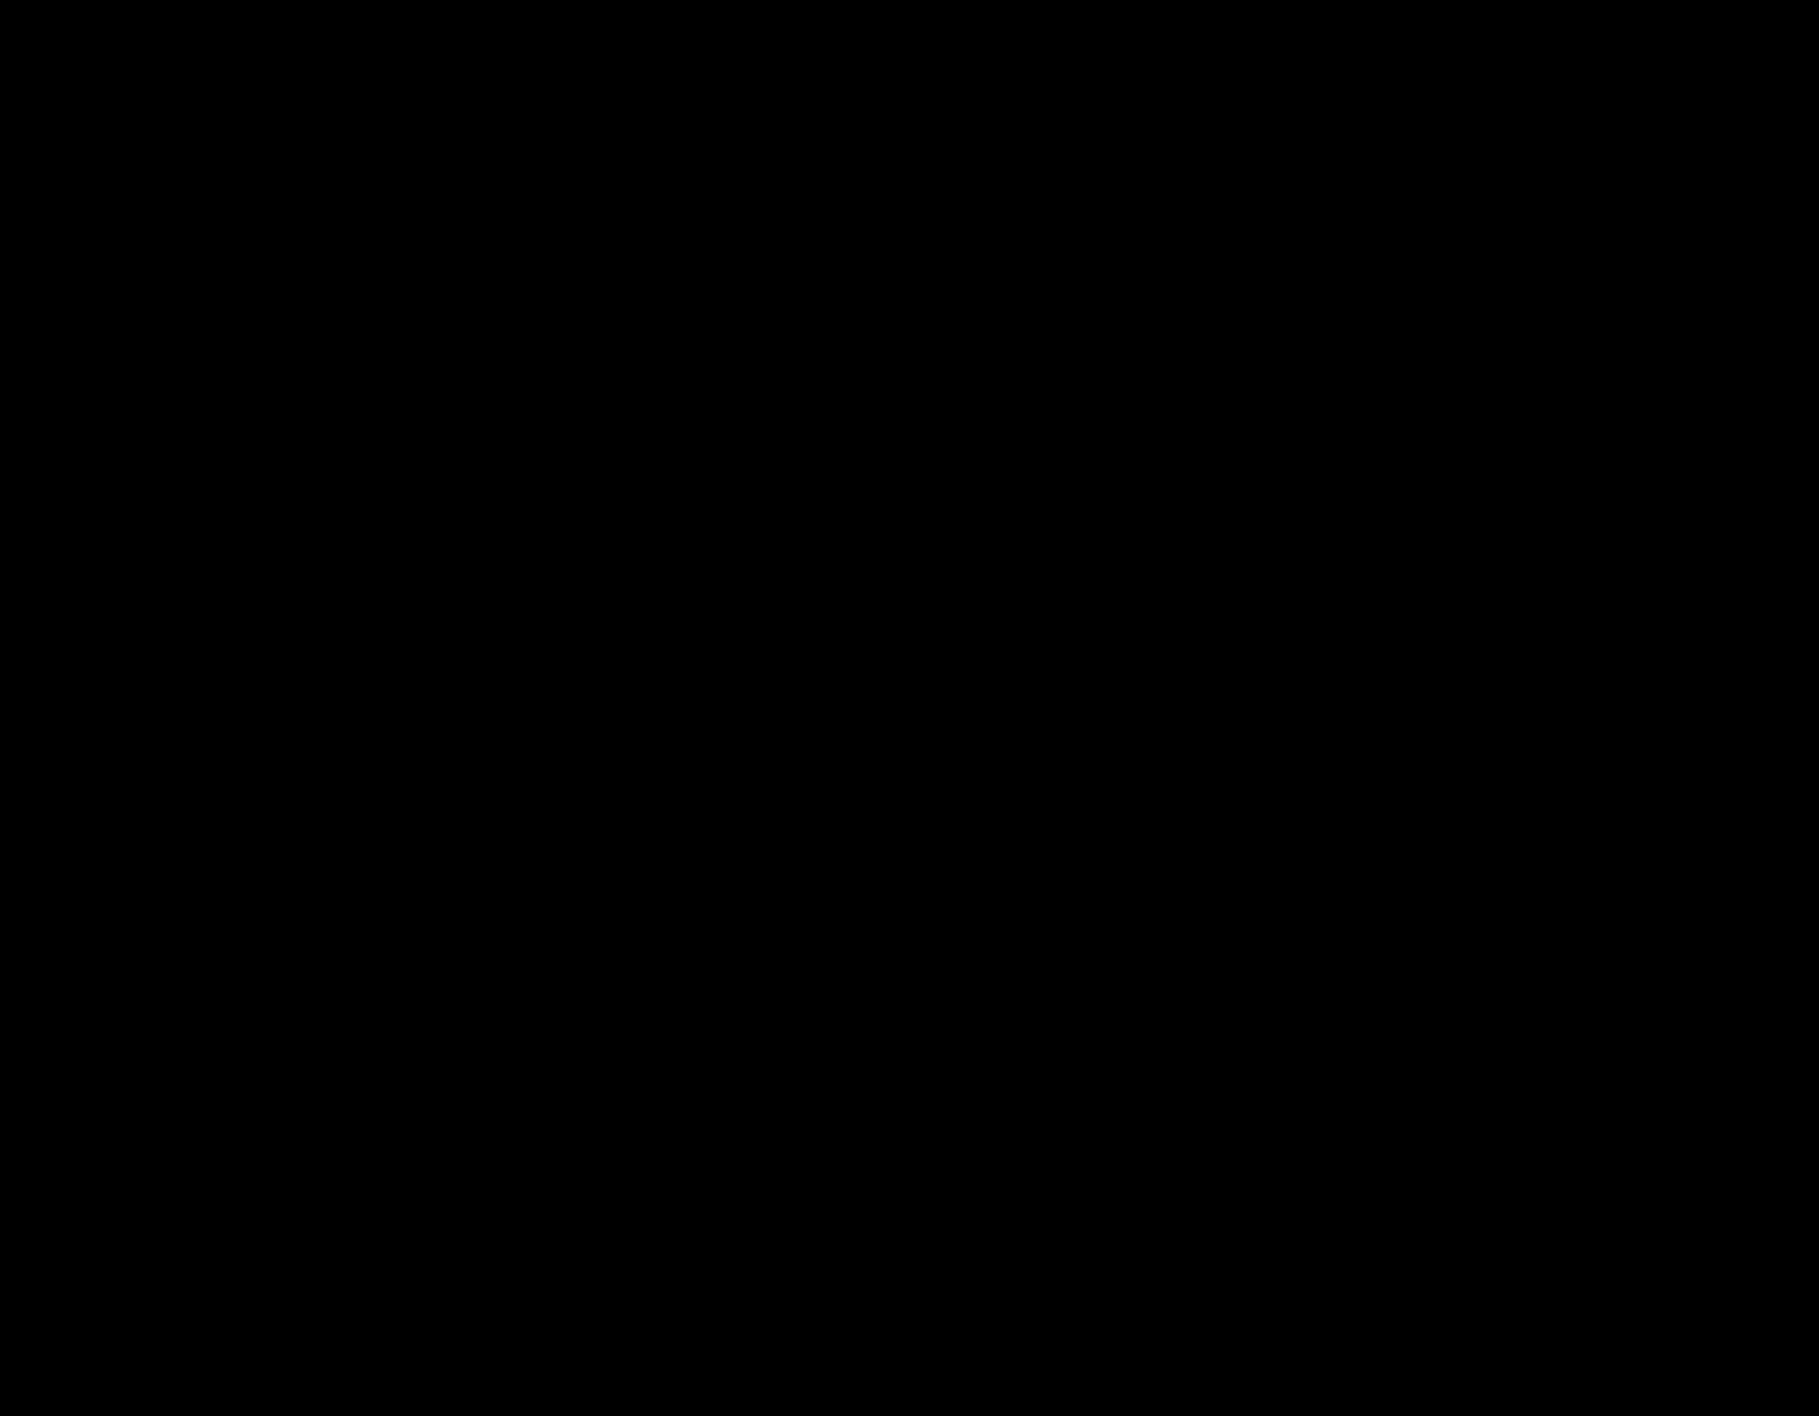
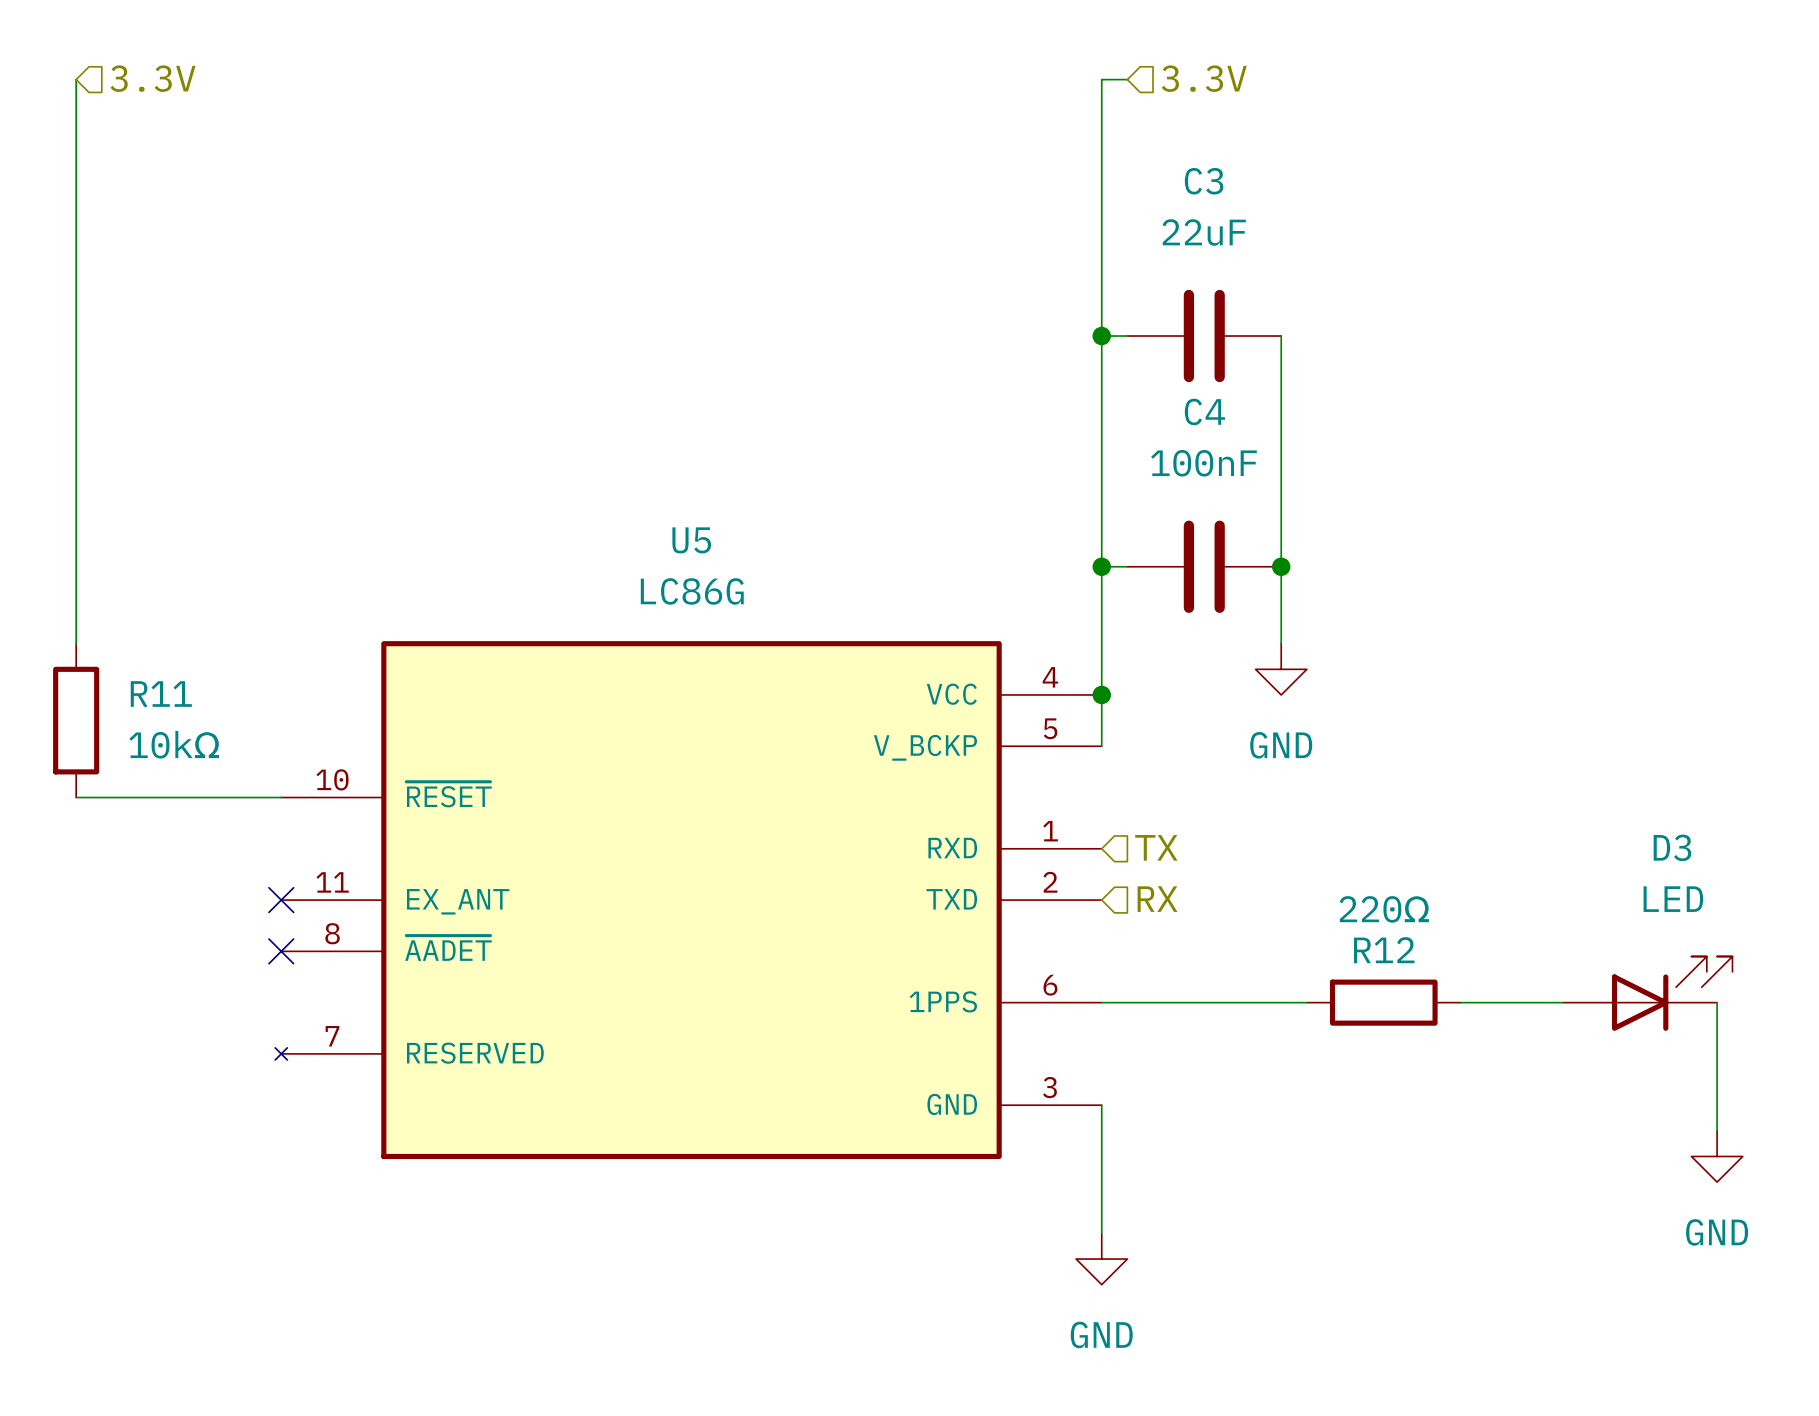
hierarchical label: none -> 3.3V (153, 78)
hierarchical label: none -> 3.3V (1204, 78)
wire: none -> (76, 79) (76, 643)
wire: none -> (1127, 79) (1101, 79) (1101, 746)
wire: none -> (1101, 336) (1127, 336)
junction: none -> (1101, 336)
C3: none -> 22uF (1204, 336)
wire: none -> (1281, 336) (1281, 643)
wire: none -> (1101, 566) (1127, 566)
junction: none -> (1101, 566)
C4: none -> 100nF (1204, 566)
junction: none -> (1281, 566)
power symbol: none -> GND (1281, 669)
junction: none -> (1101, 694)
R11: none -> 10kΩ (76, 720)
wire: none -> (76, 797) (281, 797)
hierarchical label: none -> TX (1156, 847)
hierarchical label: none -> RX (1157, 899)
no-connect mark: none -> (281, 900)
U5: none -> LC86G (688, 900)
no-connect mark: none -> (281, 951)
D3: none -> LED (1647, 993)
wire: none -> (1101, 1002) (1306, 1002)
R12: none -> 220Ω (1383, 1002)
wire: none -> (1460, 1002) (1563, 1002)
wire: none -> (1717, 1002) (1717, 1130)
wire: none -> (1101, 1105) (1101, 1233)
power symbol: none -> GND (1717, 1156)
power symbol: none -> GND (1101, 1259)

